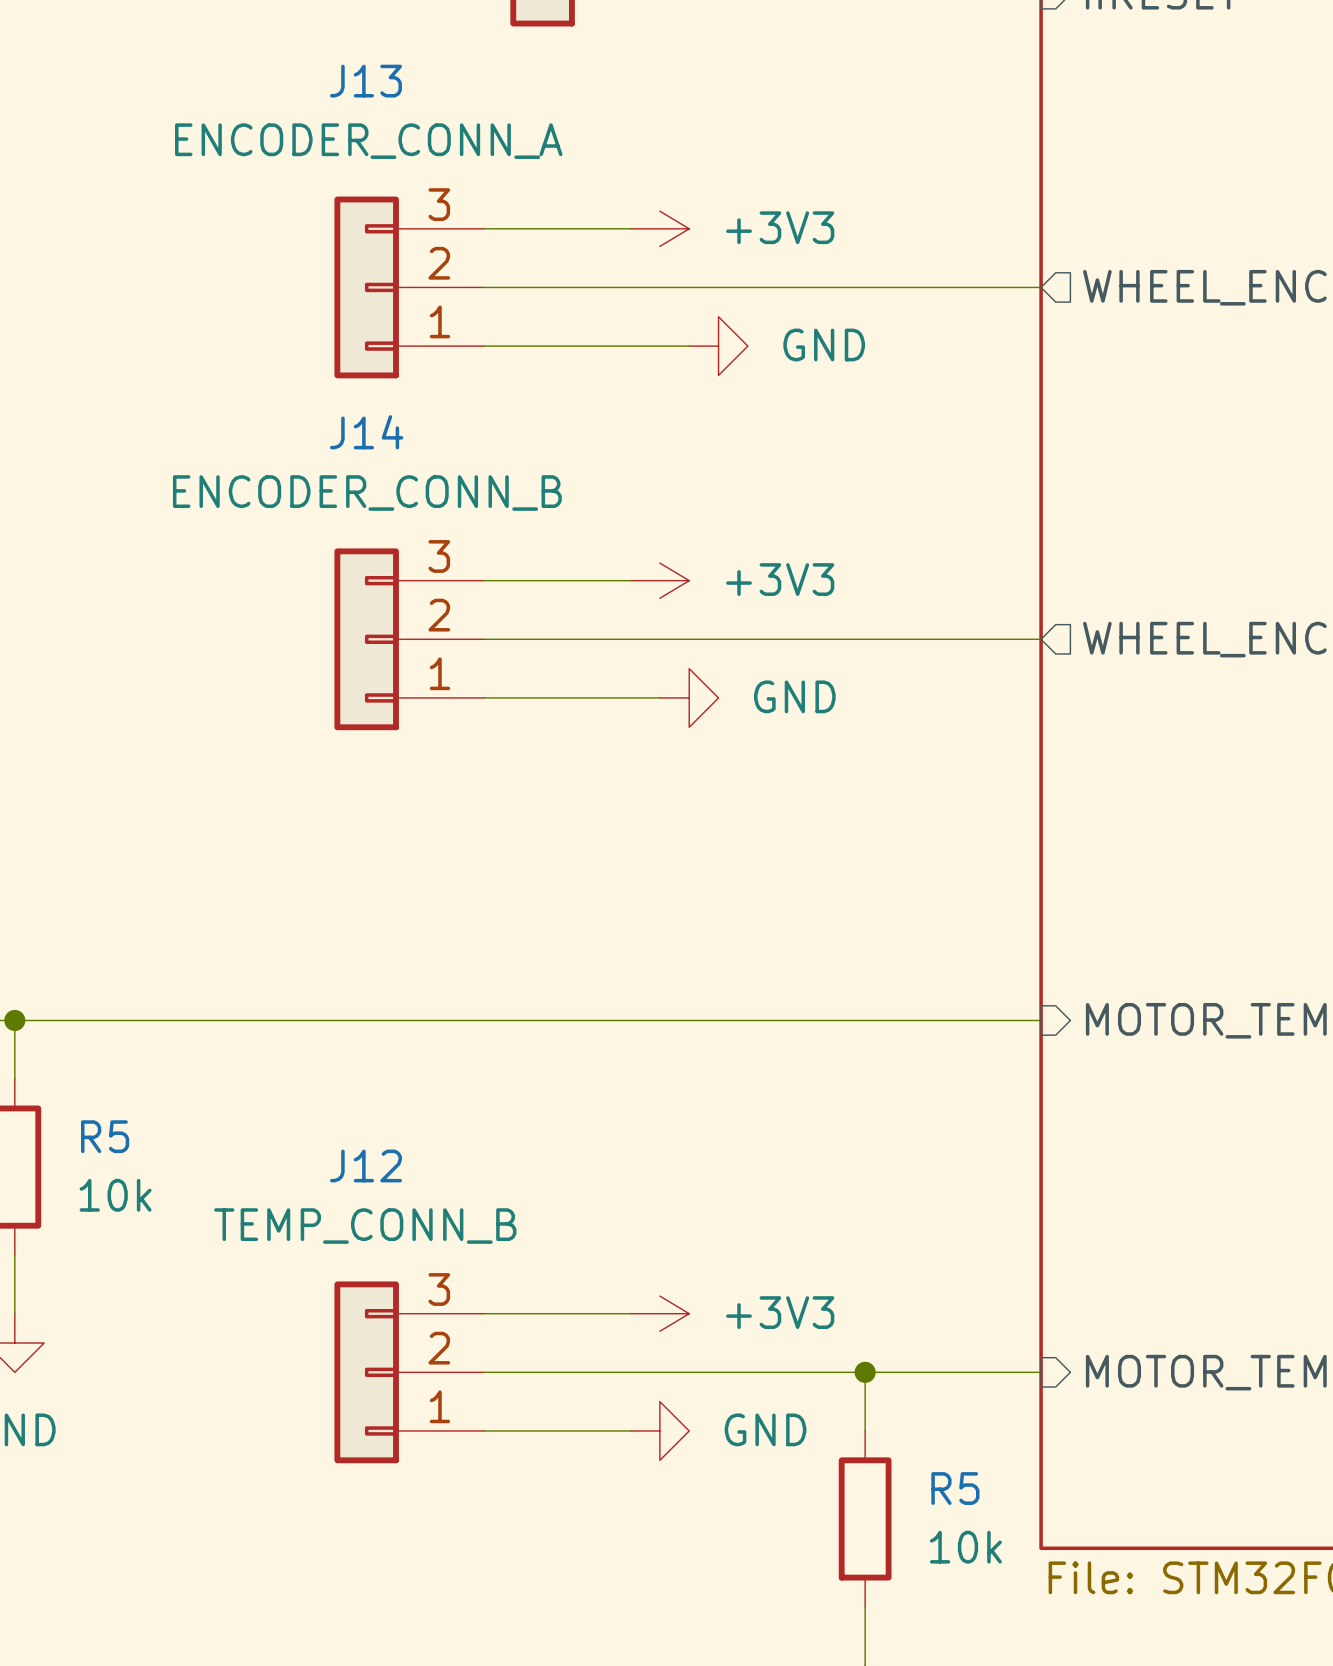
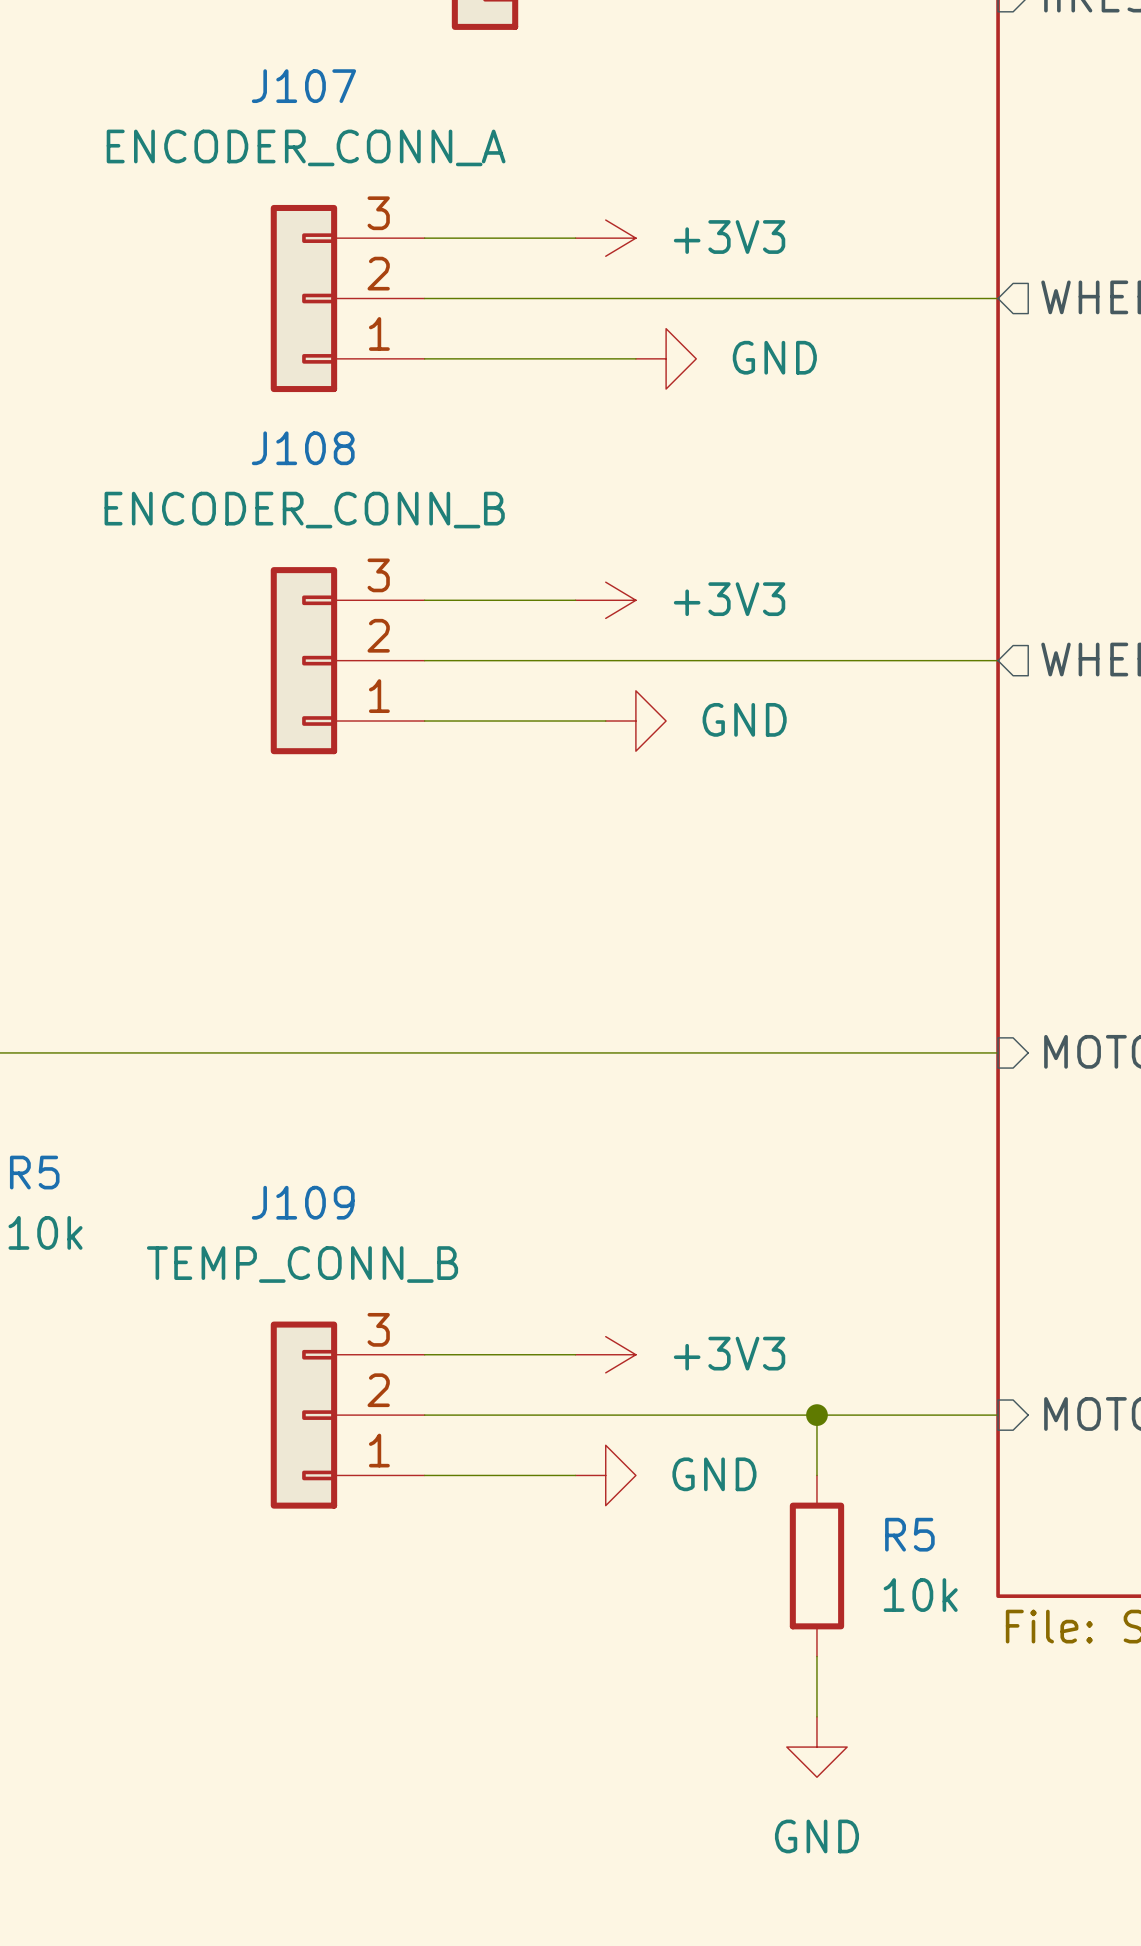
J13 name: J13 (365, 81) -> J107 (303, 86)
J14 name: J14 (366, 432) -> J108 (303, 448)
J12 name: J12 (365, 1165) -> J109 (303, 1202)

